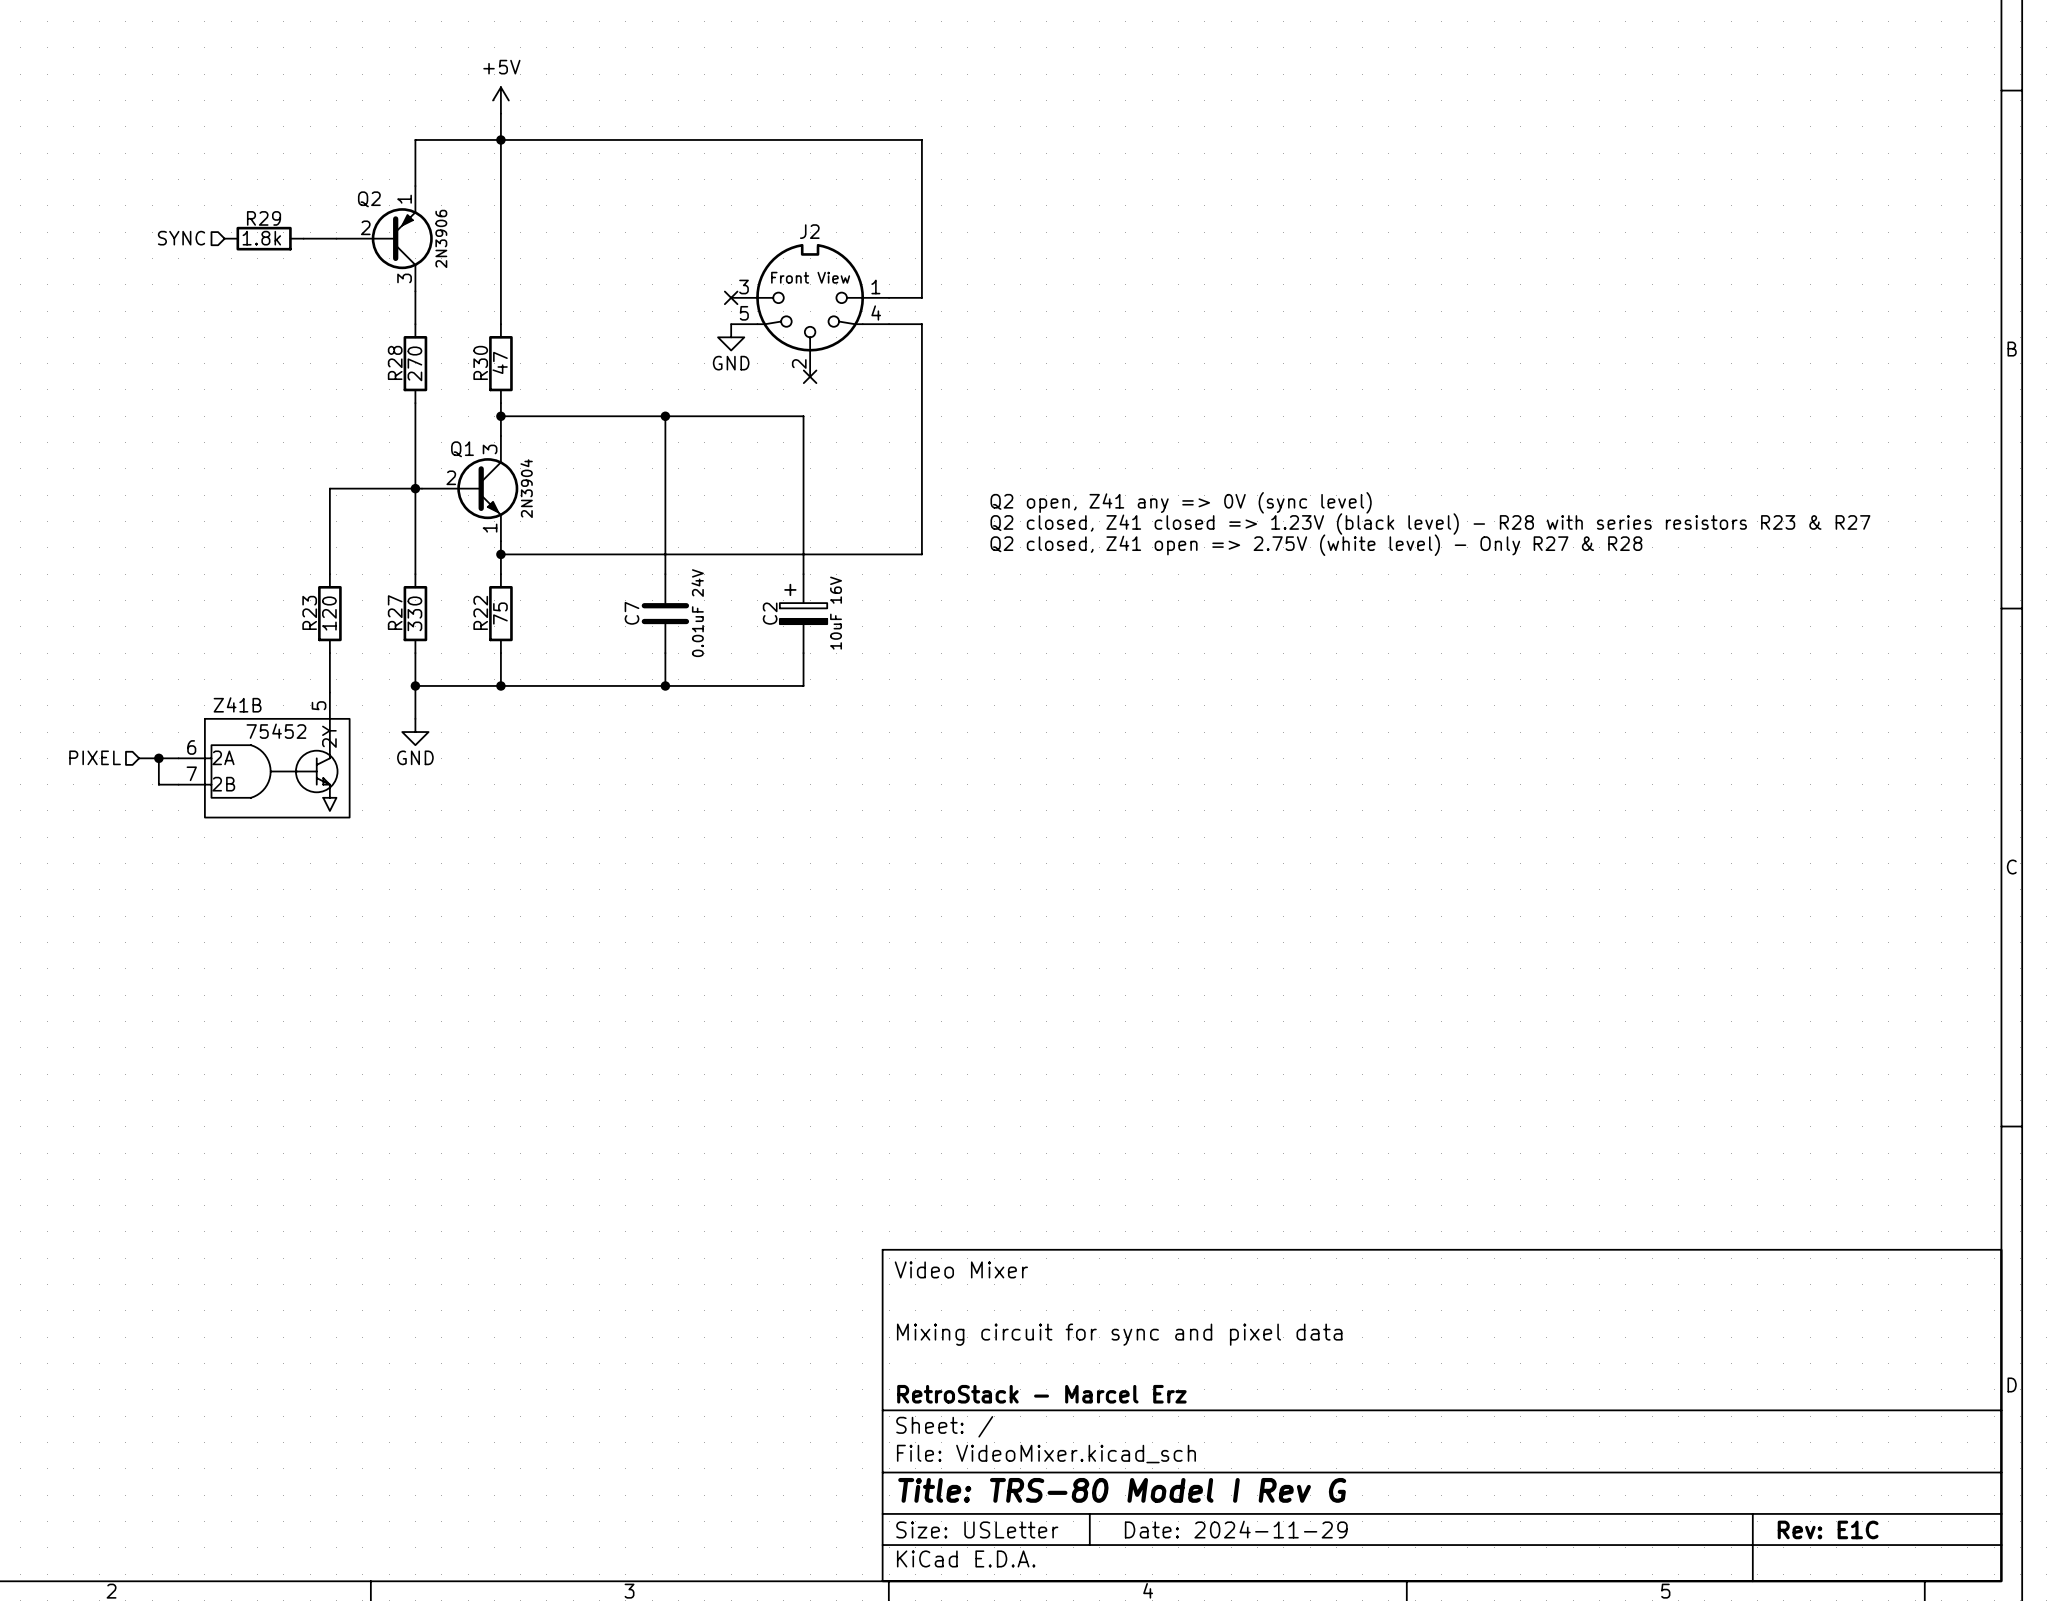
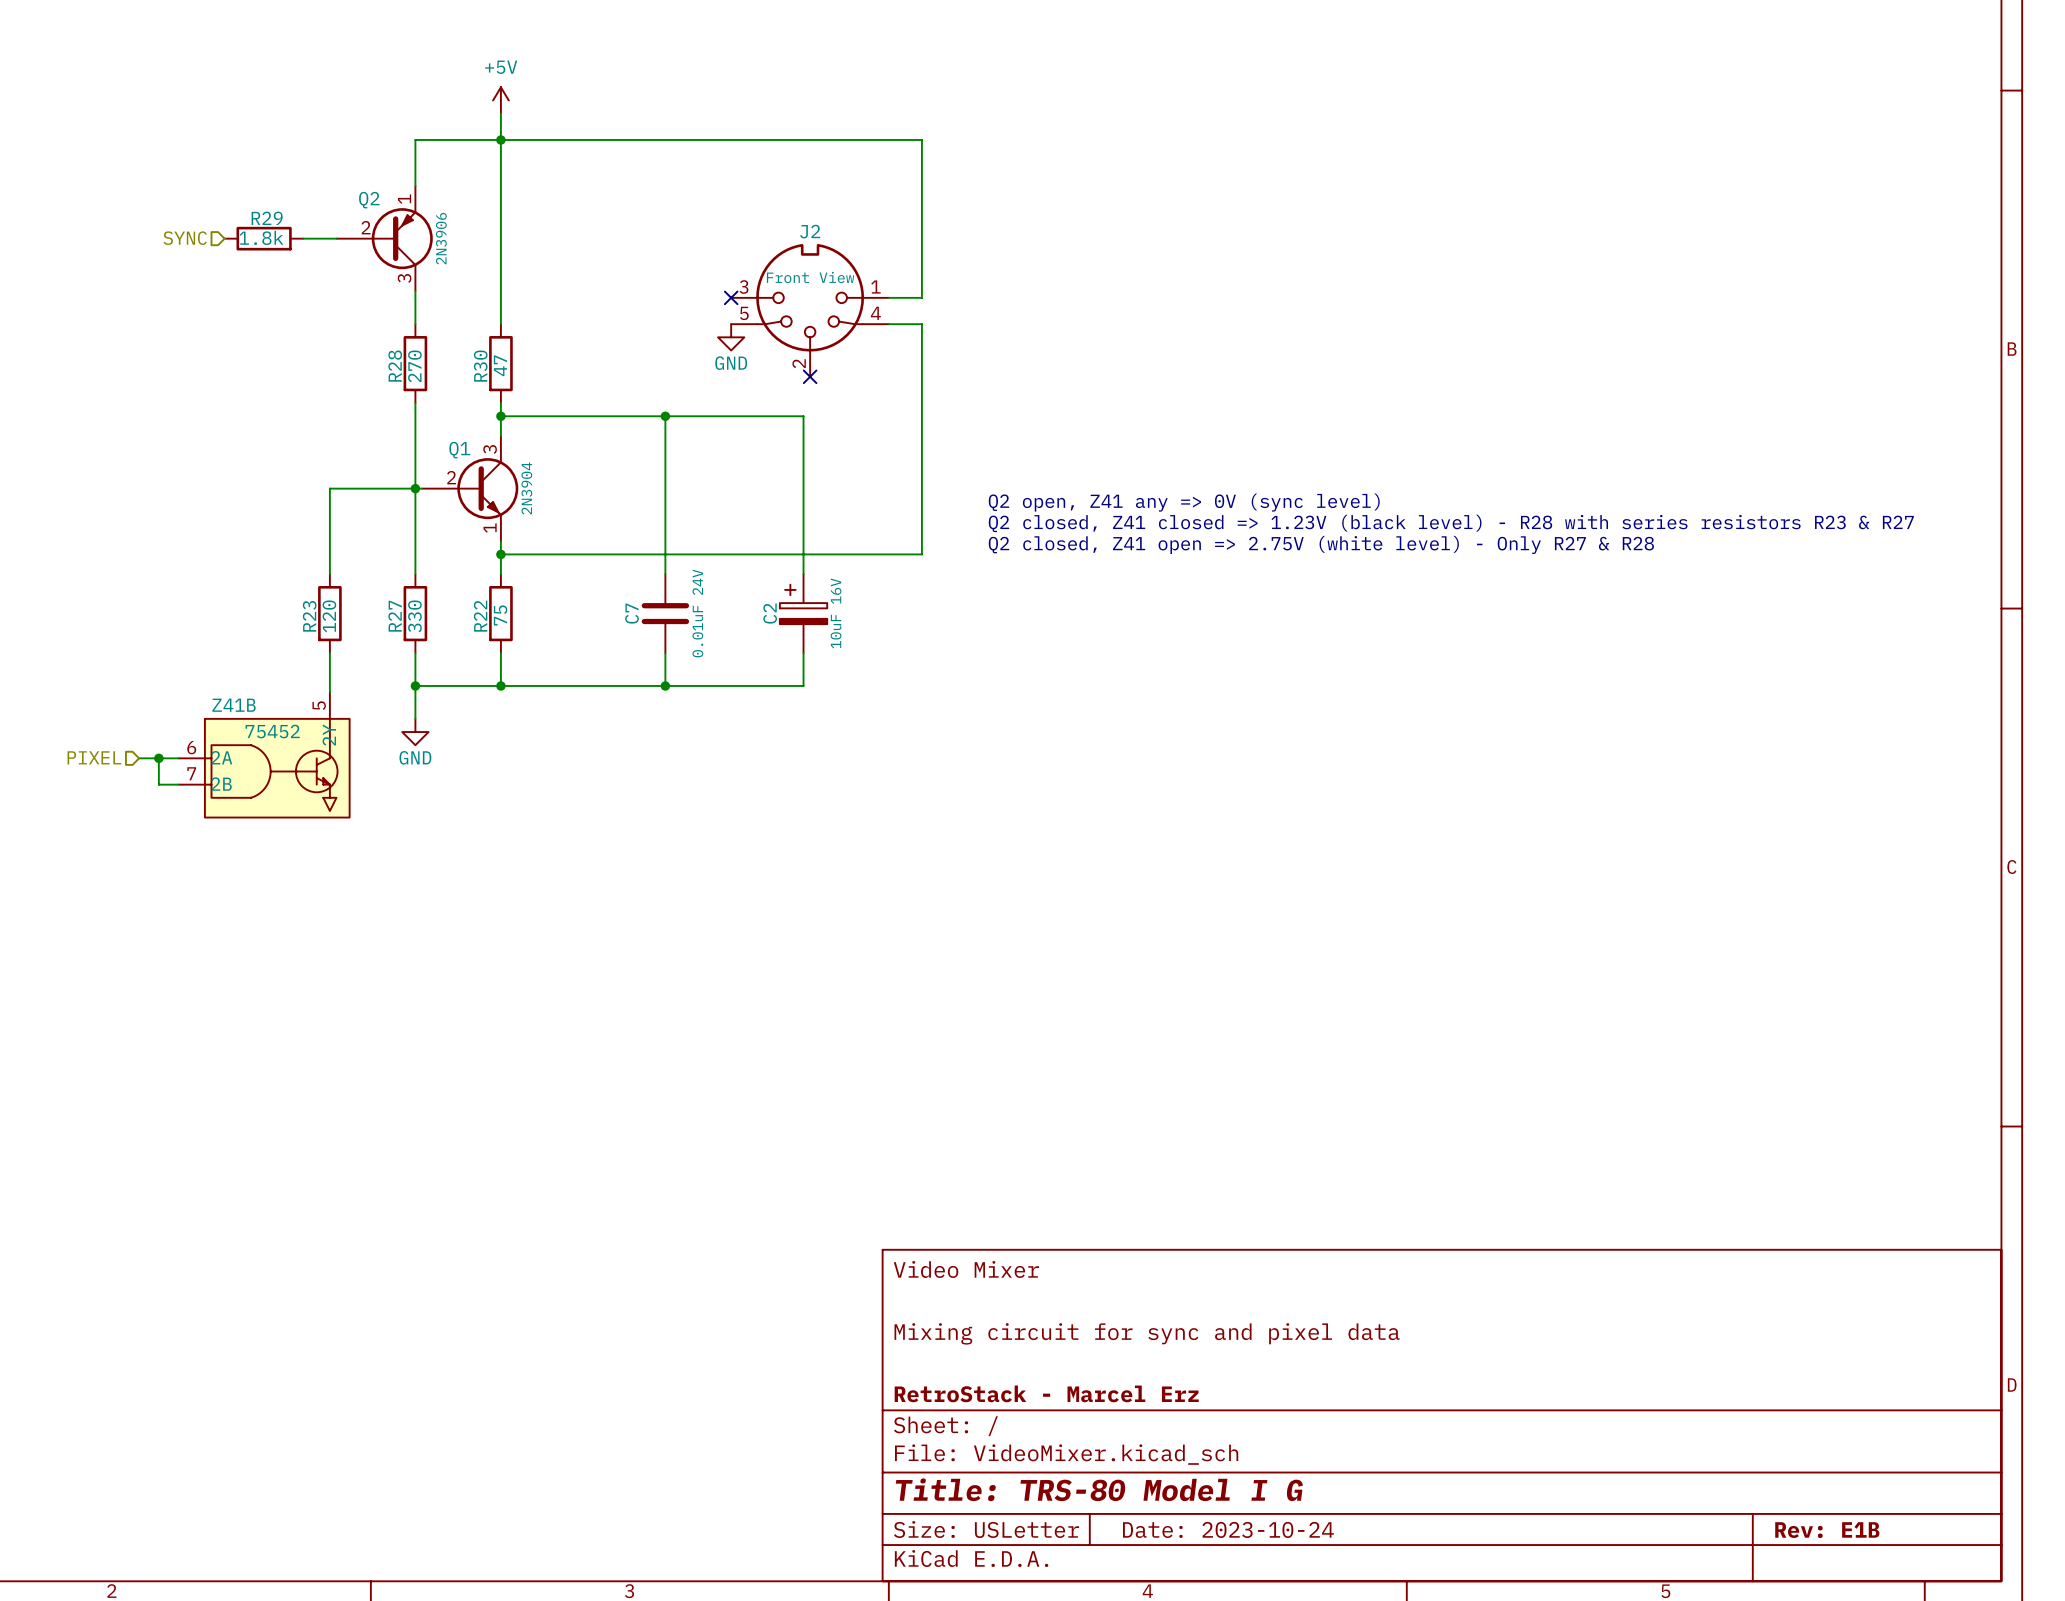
title block: Title: TRS-80 Model I Rev G (1122, 1490) -> Title: TRS-80 Model I G (1099, 1489)
title block: Date: 2024-11-29 (1236, 1529) -> Date: 2023-10-24 (1228, 1529)
title block: Rev: E1C (1828, 1529) -> Rev: E1B (1827, 1530)

